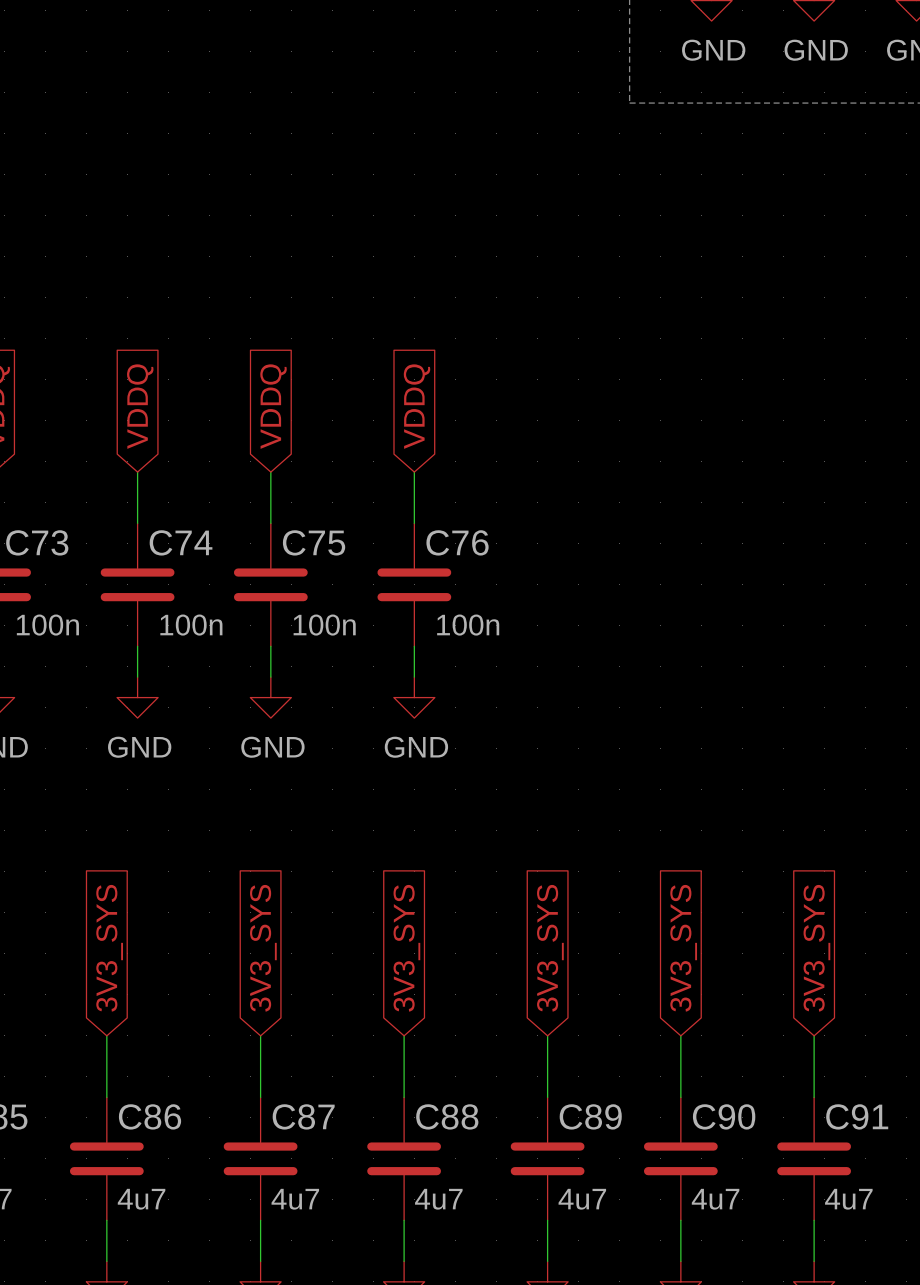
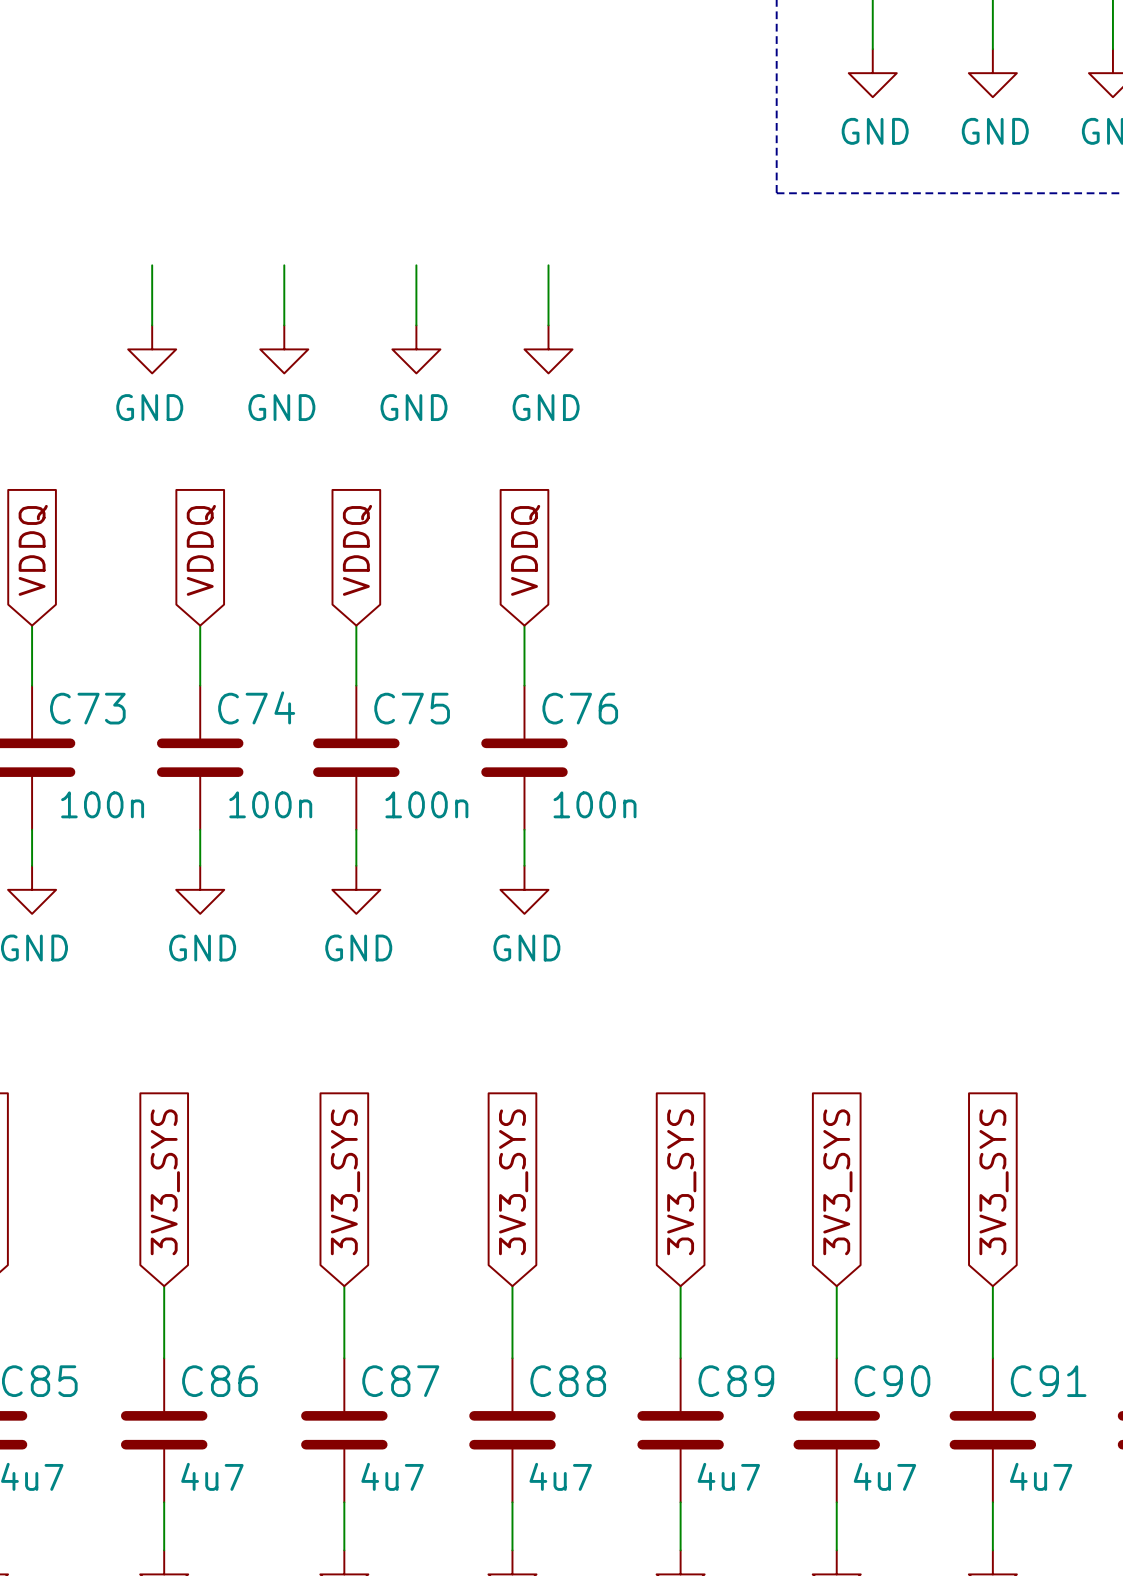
wire: none -> (152, 265) (152, 325)
wire: none -> (284, 265) (284, 325)
wire: none -> (416, 265) (416, 325)
wire: none -> (548, 265) (548, 325)
power symbol: none -> GND (152, 349)
power symbol: none -> GND (284, 349)
power symbol: none -> GND (416, 349)
power symbol: none -> GND (548, 349)

